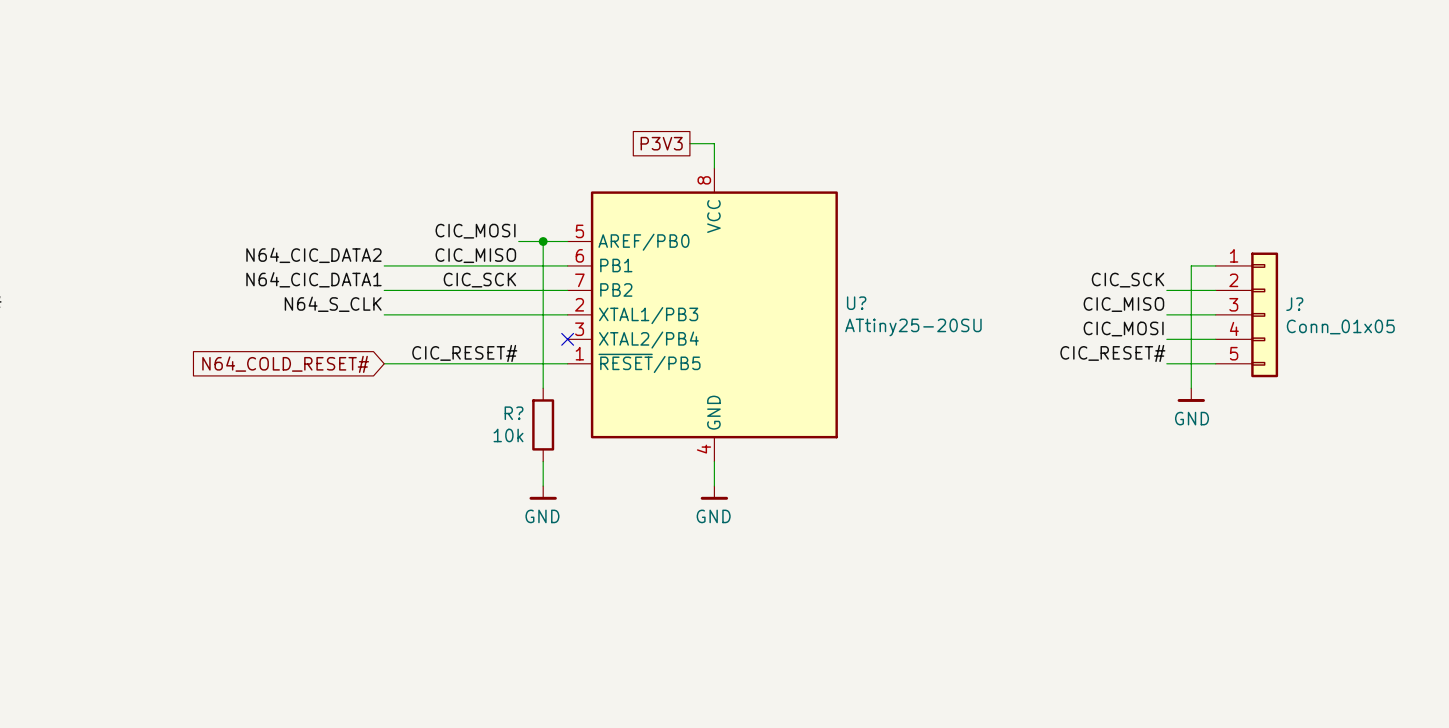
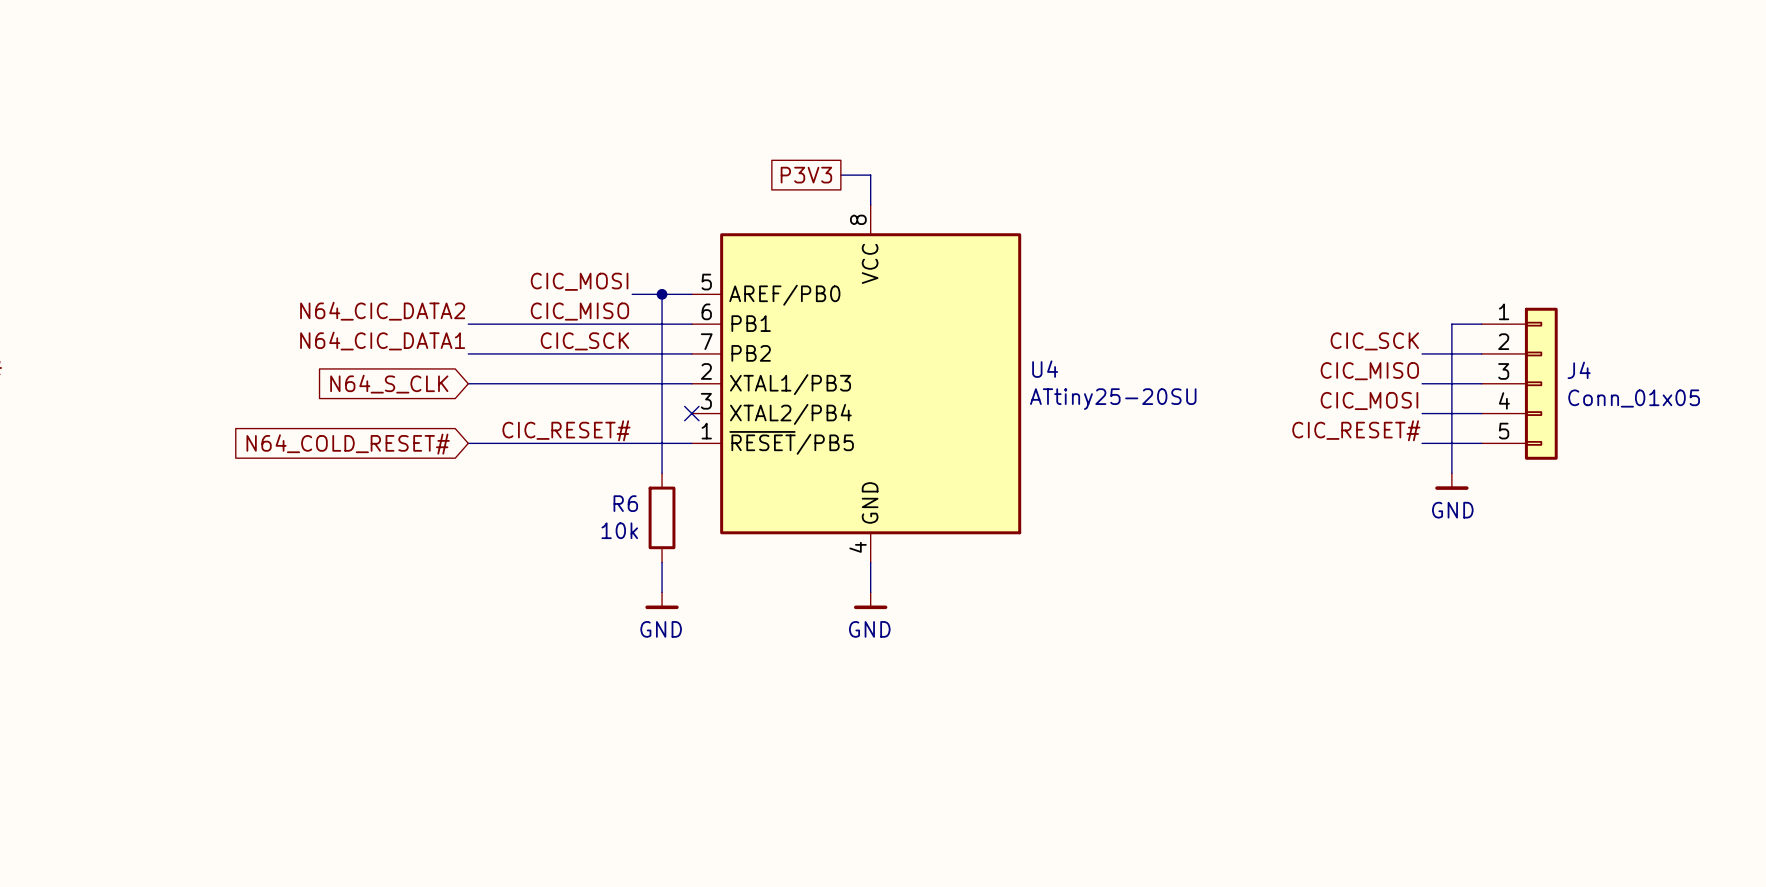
U? name: U? (856, 303) -> U4 (1045, 369)
label: N64_S_CLK (333, 304) -> none
J? name: J? (1294, 304) -> J4 (1579, 370)
global label: none -> N64_S_CLK (389, 384)
R? name: R? (514, 413) -> R6 (625, 503)

